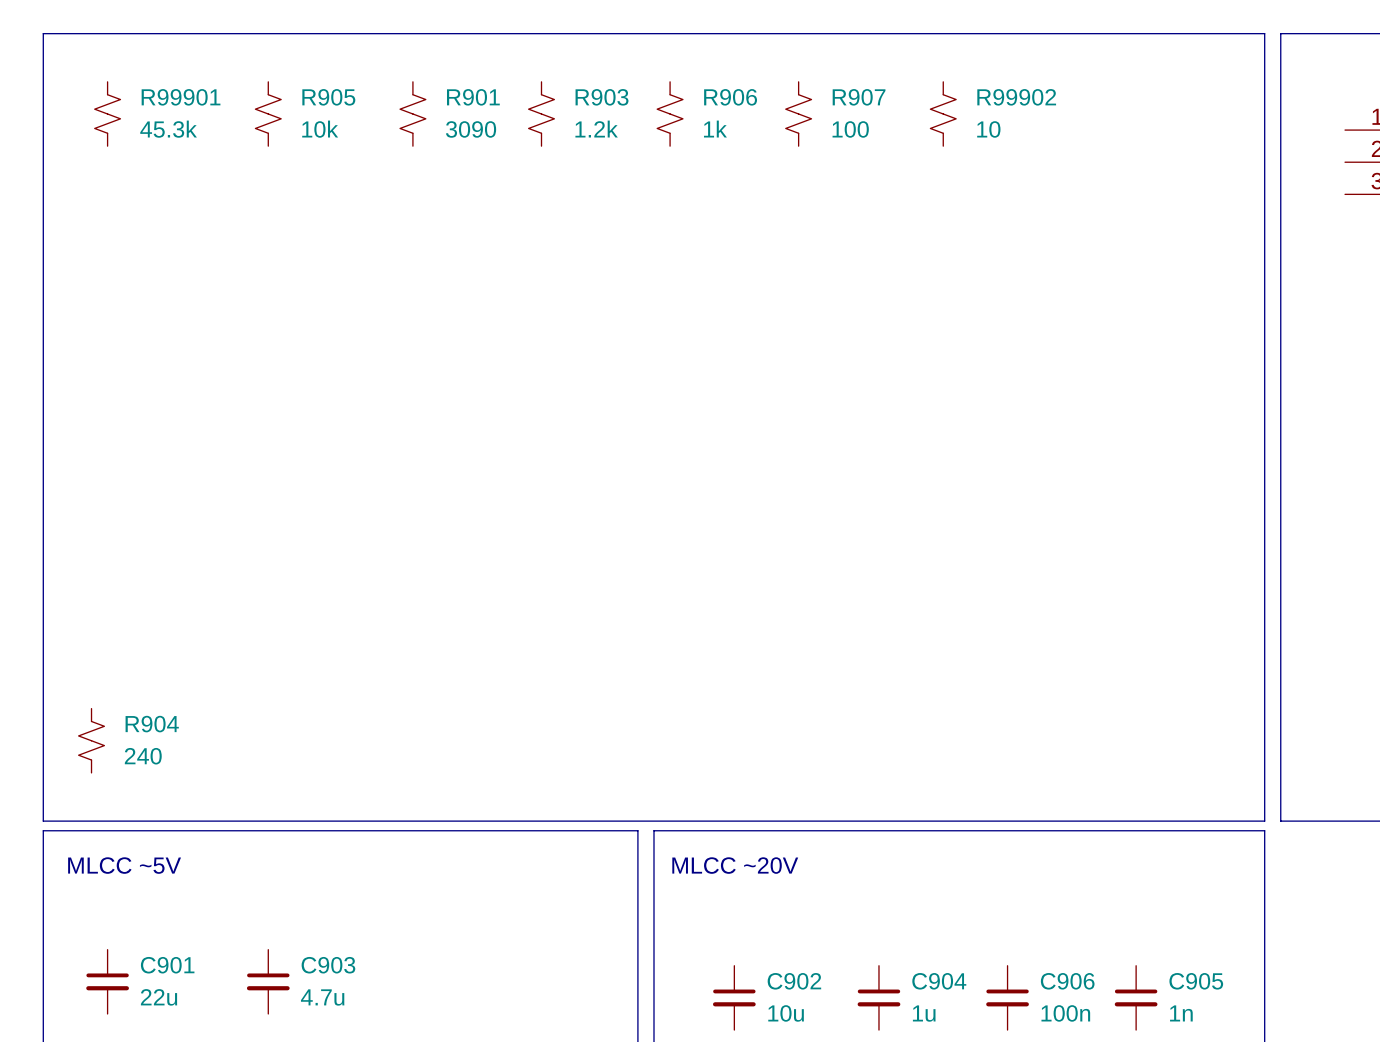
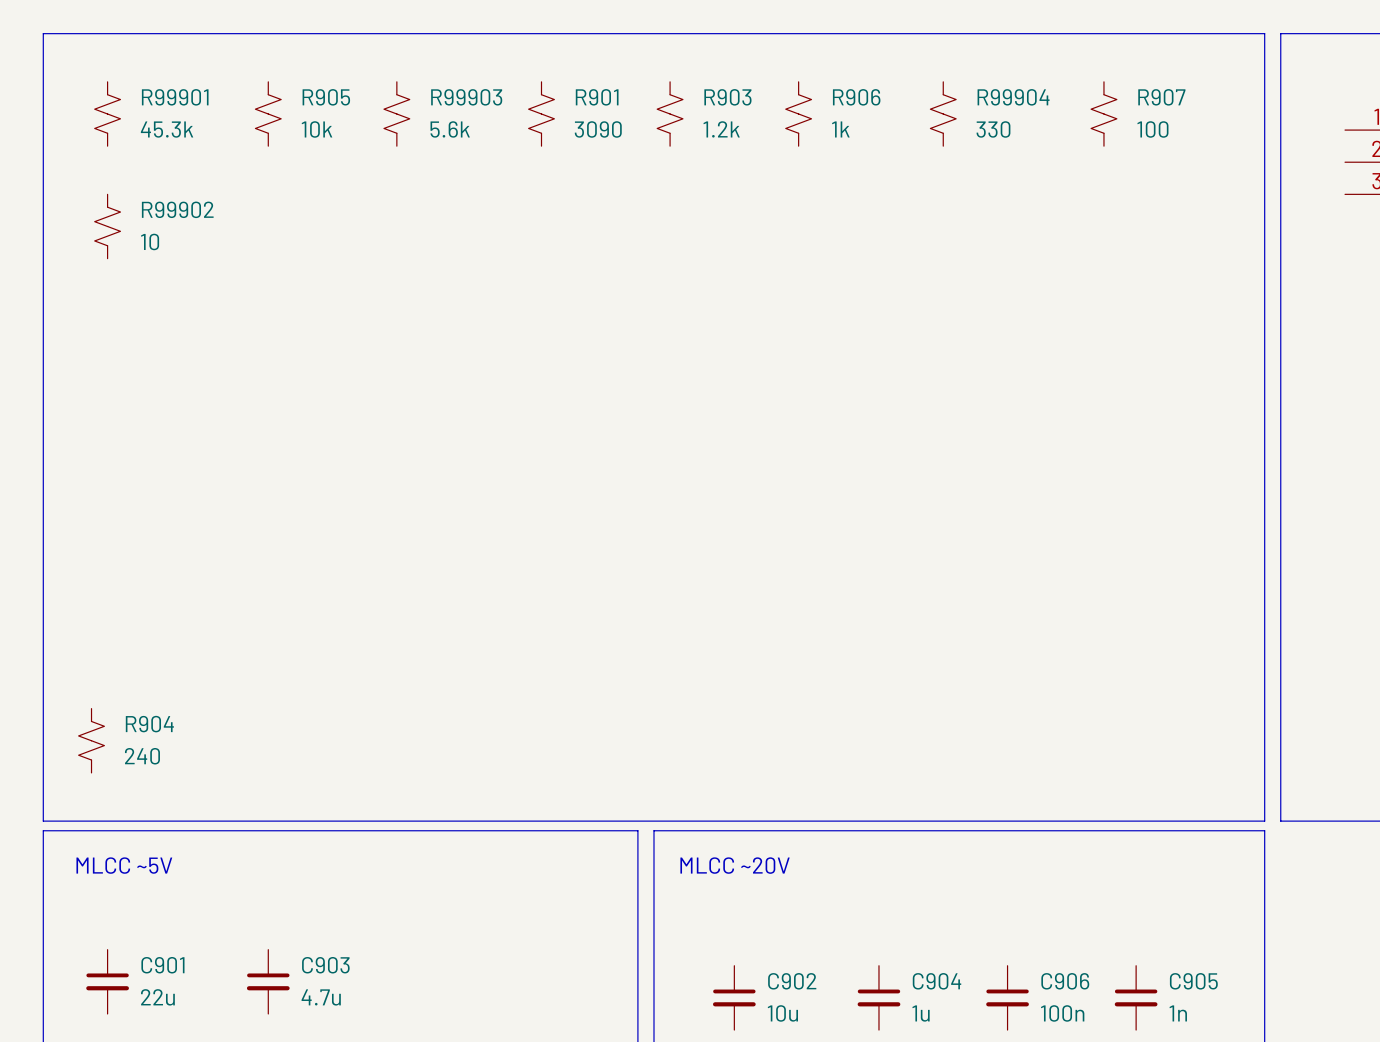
R903 name: R903 (602, 97) -> R901 (597, 97)
R906 name: R906 (730, 97) -> R903 (727, 97)
R907 name: R907 (859, 97) -> R906 (856, 97)
R99902 name: R99902 (1016, 97) -> R99904 (1013, 97)
R99903: none -> 5.6k (396, 114)
R901: 3090 (412, 114) -> none
R907: none -> 100 (1103, 114)
R903 value: 1.2k (596, 129) -> 3090 (598, 129)
R906 value: 1k (715, 129) -> 1.2k (721, 129)
R907 value: 100 (850, 129) -> 1k (840, 129)
R99902 value: 10 (988, 129) -> 330 (993, 129)
R99902: none -> 10 (107, 226)

